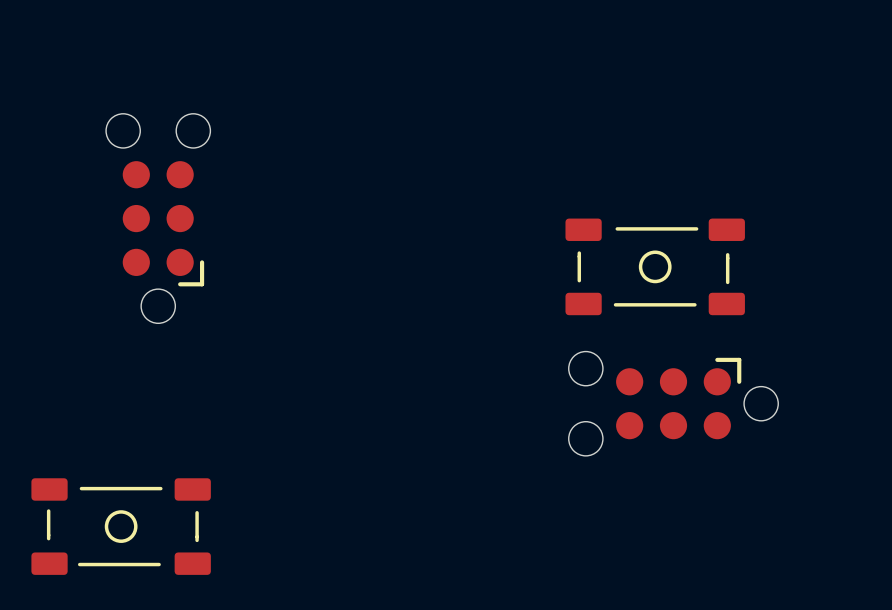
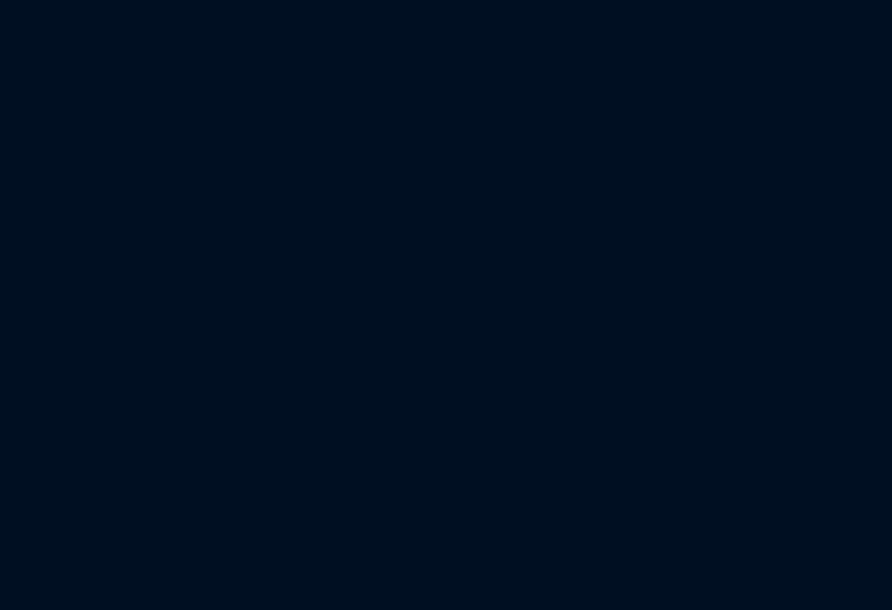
part: (158, 218) -> none
part: (655, 266) -> none
part: (673, 403) -> none
part: (121, 526) -> none

